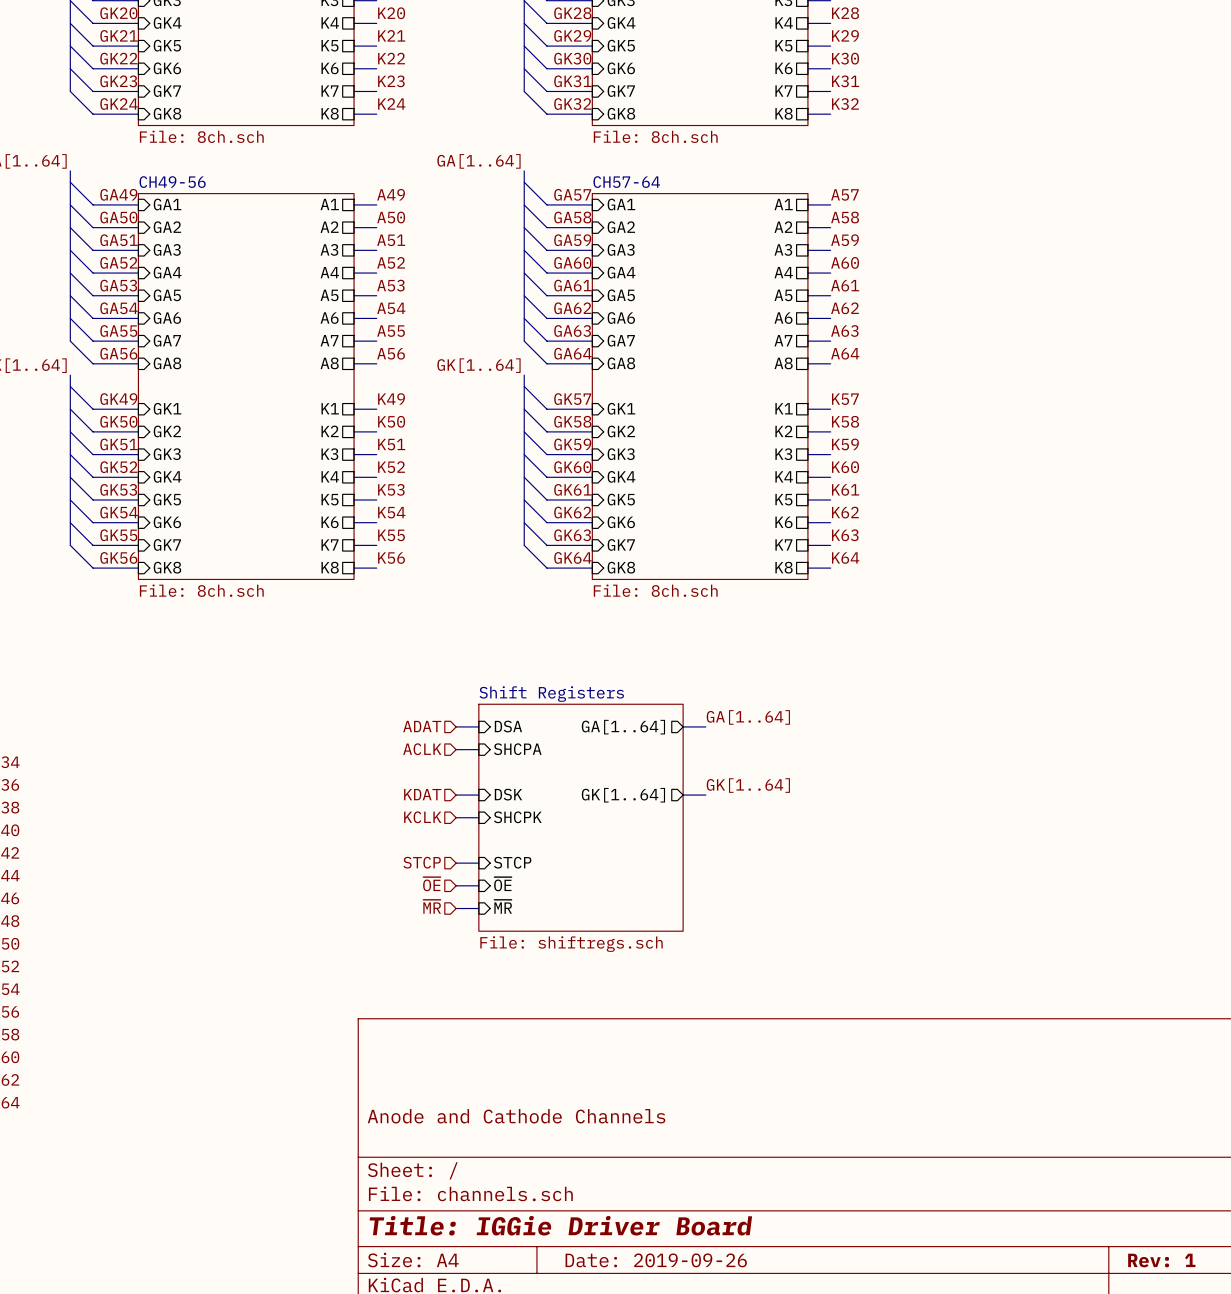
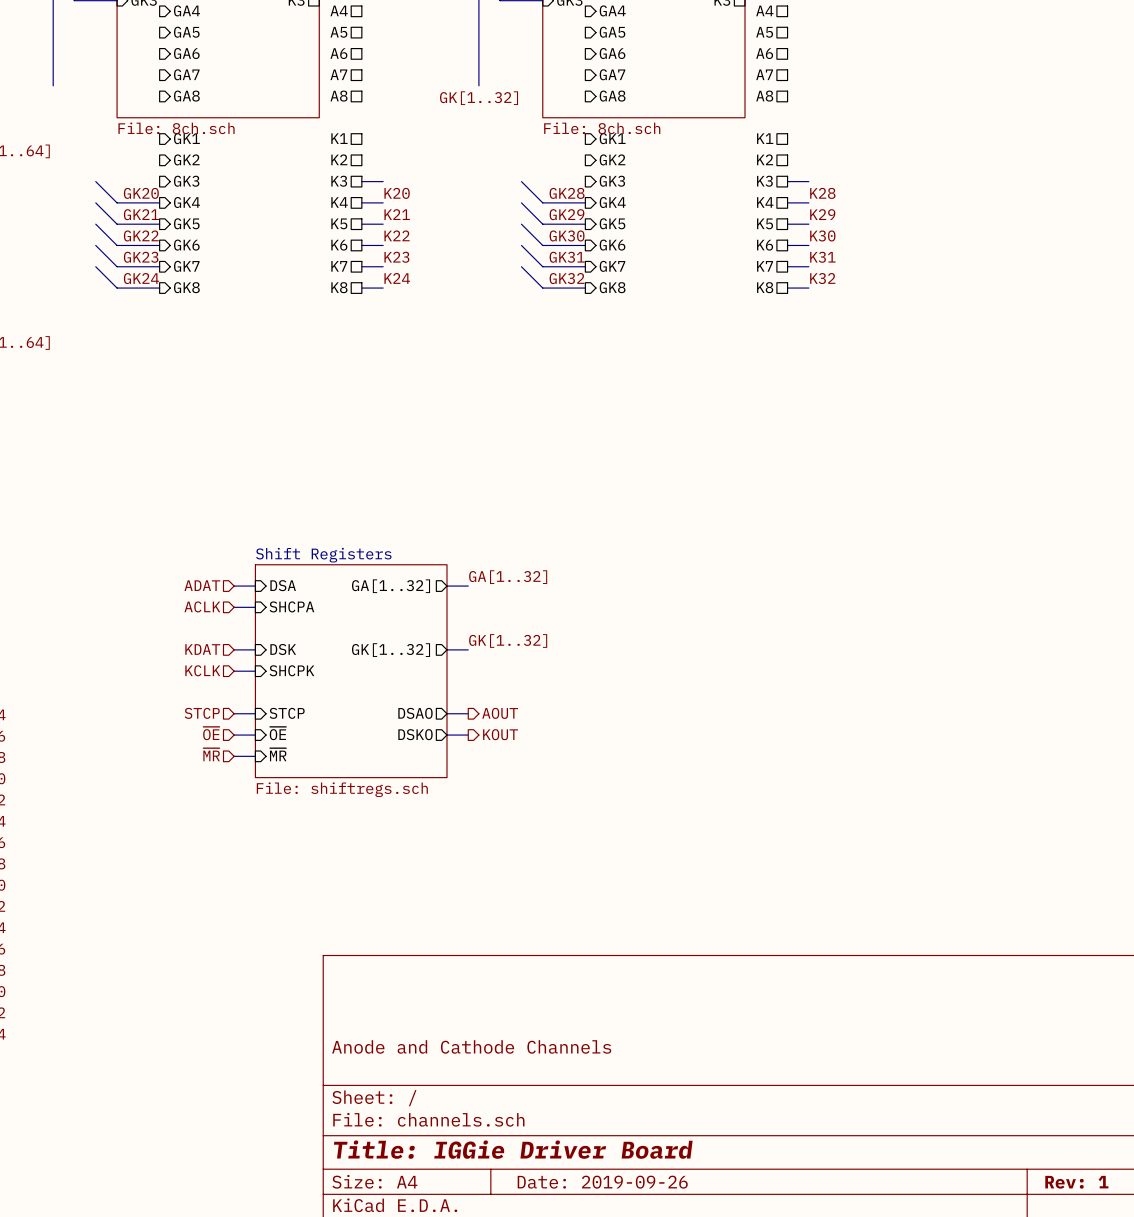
wire: (70, 0) (93, 23) (138, 23) -> (95, 181) (117, 202) (159, 202)
wire: (354, 0) (376, 0) -> (361, 181) (383, 181)
wire: (524, 0) (546, 23) (592, 23) -> (521, 181) (542, 202) (585, 202)
wire: (807, 0) (830, 0) -> (787, 181) (808, 181)
sheet pin: none -> GA4 (187, 10)
sheet pin: none -> A4 (339, 10)
sheet pin: none -> GA4 (612, 10)
sheet pin: none -> A4 (764, 10)
label position: GK20 (118, 13) -> GK20 (141, 193)
label position: K20 (391, 13) -> K20 (397, 193)
label position: GK28 (572, 13) -> GK28 (567, 193)
label position: K28 (845, 13) -> K28 (822, 193)
sheet pin: GK4 (167, 22) -> none
sheet pin: K4 (330, 22) -> none
sheet pin: GK4 (621, 22) -> none
sheet pin: K4 (784, 22) -> none
wire: (70, 23) (93, 46) (138, 46) -> (95, 202) (117, 224) (159, 224)
wire: (354, 23) (376, 23) -> (361, 202) (383, 202)
wire: (524, 23) (546, 46) (592, 46) -> (521, 202) (542, 224) (585, 224)
wire: (807, 23) (830, 23) -> (787, 202) (808, 202)
sheet pin: none -> GA5 (186, 32)
sheet pin: none -> A5 (338, 32)
sheet pin: none -> GA5 (612, 32)
sheet pin: none -> A5 (764, 32)
label position: GK21 (118, 35) -> GK21 (141, 214)
label position: K21 (391, 35) -> K21 (397, 214)
label position: GK29 (572, 35) -> GK29 (566, 214)
label position: K29 (845, 35) -> K29 (822, 214)
sheet pin: GK5 (167, 45) -> none
sheet pin: K5 (330, 45) -> none
sheet pin: GK5 (621, 45) -> none
sheet pin: K5 (783, 45) -> none
wire: (70, 46) (93, 68) (138, 68) -> (95, 224) (117, 245) (159, 245)
wire: (354, 46) (376, 46) -> (361, 224) (383, 224)
wire: (524, 46) (546, 68) (592, 68) -> (521, 224) (542, 245) (585, 245)
wire: (807, 46) (830, 46) -> (787, 224) (808, 224)
sheet pin: none -> GA6 (186, 53)
sheet pin: none -> A6 (338, 53)
sheet pin: none -> GA6 (612, 53)
sheet pin: none -> A6 (764, 53)
label position: GK22 (118, 58) -> GK22 (141, 235)
label position: K22 (391, 58) -> K22 (397, 235)
label position: GK30 (572, 58) -> GK30 (567, 235)
label position: K30 (845, 58) -> K30 (822, 235)
wire: (70, 68) (93, 91) (138, 91) -> (95, 245) (117, 266) (159, 266)
sheet pin: GK6 (167, 68) -> none
sheet pin: K6 (330, 68) -> none
wire: (354, 68) (376, 68) -> (361, 245) (383, 245)
wire: (524, 68) (546, 91) (592, 91) -> (521, 245) (542, 266) (585, 266)
sheet pin: GK6 (621, 68) -> none
sheet pin: K6 (783, 68) -> none
wire: (807, 68) (830, 68) -> (787, 245) (808, 245)
sheet pin: none -> GA7 (186, 74)
sheet pin: none -> A7 (338, 74)
sheet pin: none -> GA7 (612, 74)
sheet pin: none -> A7 (764, 74)
label position: GK23 (118, 81) -> GK23 (141, 257)
label position: K23 (391, 81) -> K23 (396, 257)
label position: GK31 (572, 81) -> GK31 (567, 257)
label position: K31 (845, 81) -> K31 (822, 257)
wire: (70, 91) (93, 114) (138, 114) -> (95, 266) (117, 288) (159, 288)
sheet pin: GK7 (167, 91) -> none
sheet pin: K7 (329, 91) -> none
wire: (354, 91) (376, 91) -> (361, 266) (383, 266)
wire: (524, 91) (546, 114) (592, 114) -> (521, 266) (542, 288) (585, 288)
sheet pin: GK7 (621, 91) -> none
sheet pin: K7 (783, 91) -> none
wire: (807, 91) (830, 91) -> (787, 266) (808, 266)
sheet pin: none -> GA8 (186, 96)
sheet pin: none -> A8 (339, 96)
sheet pin: none -> GA8 (612, 96)
sheet pin: none -> A8 (764, 96)
label position: K24 (391, 103) -> K24 (397, 278)
label position: GK24 (119, 104) -> GK24 (141, 278)
label: none -> GK[1..32] (479, 98)
label position: GK32 (572, 104) -> GK32 (567, 278)
label position: K32 (845, 104) -> K32 (822, 278)
sheet pin: GK8 (167, 113) -> none
sheet pin: K8 (330, 113) -> none
sheet pin: GK8 (621, 113) -> none
sheet pin: K8 (784, 113) -> none
wire: (354, 114) (376, 114) -> (361, 288) (383, 288)
wire: (807, 114) (830, 114) -> (787, 288) (808, 288)
sheet pin: none -> GK1 (186, 138)
sheet pin: none -> K1 (339, 138)
sheet pin: none -> GK1 (612, 138)
sheet pin: none -> K1 (765, 138)
label: GA[1..64] (478, 161) -> none
bus: (70, 170) (70, 341) -> none
sheet pin: none -> GK2 (186, 159)
sheet pin: none -> K2 (339, 159)
bus: (524, 170) (524, 341) -> none
sheet pin: none -> GK2 (612, 159)
sheet pin: none -> K2 (765, 159)
wire: (70, 182) (93, 204) (138, 204) -> none
wire: (524, 182) (546, 204) (592, 204) -> none
sheet pin: none -> GK3 (186, 181)
sheet pin: none -> K3 (339, 181)
sheet pin: none -> GK3 (612, 181)
sheet pin: none -> K3 (764, 181)
label: GA49 (118, 194) -> none
label: A49 (391, 194) -> none
label: GA57 (572, 194) -> none
label: A57 (844, 194) -> none
wire: (70, 204) (93, 227) (138, 227) -> none
sheet pin: GA1 (167, 204) -> none
sheet pin: A1 (329, 204) -> none
wire: (354, 204) (376, 204) -> none
wire: (524, 204) (546, 227) (592, 227) -> none
sheet pin: GA1 (621, 204) -> none
sheet pin: A1 (783, 204) -> none
wire: (807, 204) (830, 204) -> none
sheet pin: none -> GK4 (187, 202)
sheet pin: none -> K4 (339, 202)
sheet pin: none -> GK4 (612, 202)
sheet pin: none -> K4 (765, 202)
label: GA50 (118, 217) -> none
label: A50 (391, 217) -> none
label: GA58 (572, 217) -> none
label: A58 (845, 217) -> none
wire: (70, 227) (93, 250) (138, 250) -> none
sheet pin: GA2 (167, 227) -> none
sheet pin: A2 (329, 227) -> none
wire: (354, 227) (376, 227) -> none
wire: (524, 227) (546, 250) (592, 250) -> none
sheet pin: GA2 (621, 227) -> none
sheet pin: A2 (783, 227) -> none
wire: (807, 227) (830, 227) -> none
sheet pin: none -> GK5 (186, 223)
sheet pin: none -> K5 (339, 223)
sheet pin: none -> GK5 (612, 223)
sheet pin: none -> K5 (765, 223)
label: GA51 (118, 240) -> none
label: A51 (391, 240) -> none
label: GA59 (572, 240) -> none
label: A59 (845, 240) -> none
sheet pin: GA3 (167, 249) -> none
sheet pin: A3 (329, 249) -> none
sheet pin: GA3 (621, 249) -> none
sheet pin: A3 (783, 249) -> none
wire: (70, 250) (93, 273) (138, 273) -> none
wire: (354, 250) (376, 250) -> none
wire: (524, 250) (546, 273) (592, 273) -> none
wire: (807, 250) (830, 250) -> none
sheet pin: none -> GK6 (186, 245)
sheet pin: none -> K6 (339, 245)
sheet pin: none -> GK6 (612, 245)
sheet pin: none -> K6 (765, 245)
label: GA52 (118, 262) -> none
label: A52 (391, 262) -> none
label: GA60 (572, 262) -> none
label: A60 (845, 262) -> none
sheet pin: GA4 (167, 272) -> none
sheet pin: A4 (329, 272) -> none
sheet pin: GA4 (621, 272) -> none
sheet pin: A4 (783, 272) -> none
wire: (70, 273) (93, 295) (138, 295) -> none
wire: (354, 273) (376, 273) -> none
wire: (524, 273) (546, 295) (592, 295) -> none
wire: (807, 273) (830, 273) -> none
sheet pin: none -> GK7 (186, 266)
sheet pin: none -> K7 (339, 266)
sheet pin: none -> GK7 (612, 266)
sheet pin: none -> K7 (765, 266)
label: GA53 (118, 285) -> none
label: A53 (390, 285) -> none
label: GA61 (572, 285) -> none
label: A61 (845, 285) -> none
wire: (70, 295) (93, 318) (138, 318) -> none
sheet pin: GA5 (167, 295) -> none
sheet pin: A5 (329, 295) -> none
wire: (354, 295) (376, 295) -> none
wire: (524, 295) (546, 318) (592, 318) -> none
sheet pin: GA5 (621, 295) -> none
sheet pin: A5 (783, 295) -> none
wire: (807, 295) (830, 295) -> none
sheet pin: none -> GK8 (186, 287)
sheet pin: none -> K8 (339, 287)
sheet pin: none -> GK8 (612, 287)
sheet pin: none -> K8 (765, 287)
label: GA54 (119, 308) -> none
label: A54 (391, 308) -> none
label: GA62 (572, 308) -> none
label: A62 (845, 308) -> none
wire: (70, 318) (93, 341) (138, 341) -> none
sheet pin: GA6 (167, 318) -> none
sheet pin: A6 (329, 318) -> none
wire: (354, 318) (376, 318) -> none
wire: (524, 318) (546, 341) (592, 341) -> none
sheet pin: GA6 (621, 318) -> none
sheet pin: A6 (783, 318) -> none
wire: (807, 318) (830, 318) -> none
label: GA55 (118, 331) -> none
label: A55 (391, 331) -> none
label: GA63 (572, 331) -> none
label: A63 (844, 331) -> none
sheet pin: GA7 (167, 340) -> none
sheet pin: A7 (329, 340) -> none
sheet pin: GA7 (621, 340) -> none
sheet pin: A7 (783, 340) -> none
wire: (70, 341) (93, 363) (138, 363) -> none
wire: (354, 341) (376, 341) -> none
wire: (524, 341) (546, 363) (592, 363) -> none
wire: (807, 341) (830, 341) -> none
label: GA56 (118, 353) -> none
label: A56 (391, 353) -> none
label: GA64 (572, 353) -> none
label: A64 (845, 353) -> none
sheet pin: GA8 (167, 363) -> none
sheet pin: A8 (329, 363) -> none
wire: (354, 363) (376, 363) -> none
sheet pin: GA8 (621, 363) -> none
sheet pin: A8 (783, 363) -> none
wire: (807, 363) (830, 363) -> none
label: GK[1..64] (478, 365) -> none
bus: (70, 375) (70, 545) -> none
bus: (524, 375) (524, 545) -> none
wire: (70, 386) (93, 409) (138, 409) -> none
sheet CH49-56: File: 8ch.sch (246, 386) -> none
wire: (524, 386) (546, 409) (592, 409) -> none
sheet CH57-64: File: 8ch.sch (700, 386) -> none
label: K49 (391, 398) -> none
label: GK49 (118, 399) -> none
label: GK57 (572, 399) -> none
label: K57 (845, 399) -> none
sheet pin: GK1 (167, 408) -> none
sheet pin: K1 (330, 408) -> none
sheet pin: GK1 (621, 408) -> none
sheet pin: K1 (784, 408) -> none
wire: (70, 409) (93, 431) (138, 431) -> none
wire: (354, 409) (376, 409) -> none
wire: (524, 409) (546, 431) (592, 431) -> none
wire: (807, 409) (830, 409) -> none
label: GK50 (118, 421) -> none
label: K50 (391, 421) -> none
label: GK58 (572, 421) -> none
label: K58 (845, 421) -> none
wire: (70, 431) (93, 454) (138, 454) -> none
sheet pin: GK2 (167, 431) -> none
sheet pin: K2 (330, 431) -> none
wire: (354, 431) (376, 431) -> none
wire: (524, 431) (546, 454) (592, 454) -> none
sheet pin: GK2 (621, 431) -> none
sheet pin: K2 (783, 431) -> none
wire: (807, 431) (830, 431) -> none
label: GK51 (118, 444) -> none
label: K51 (391, 444) -> none
label: GK59 (572, 444) -> none
label: K59 (845, 444) -> none
wire: (70, 454) (93, 477) (138, 477) -> none
sheet pin: GK3 (167, 454) -> none
sheet pin: K3 (329, 454) -> none
wire: (354, 454) (376, 454) -> none
wire: (524, 454) (546, 477) (592, 477) -> none
sheet pin: GK3 (621, 454) -> none
sheet pin: K3 (783, 454) -> none
wire: (807, 454) (830, 454) -> none
label: GK52 (118, 467) -> none
label: K52 (391, 467) -> none
label: GK60 (572, 467) -> none
label: K60 (845, 467) -> none
sheet pin: GK4 (167, 476) -> none
sheet pin: K4 (330, 476) -> none
sheet pin: GK4 (621, 476) -> none
sheet pin: K4 (784, 476) -> none
wire: (70, 477) (93, 499) (138, 499) -> none
wire: (354, 477) (376, 477) -> none
wire: (524, 477) (546, 499) (592, 499) -> none
wire: (807, 477) (830, 477) -> none
label: GK53 (118, 489) -> none
label: K53 (391, 489) -> none
label: GK61 (572, 489) -> none
label: K61 (845, 489) -> none
wire: (70, 499) (93, 522) (138, 522) -> none
sheet pin: GK5 (167, 499) -> none
sheet pin: K5 (330, 499) -> none
wire: (354, 499) (376, 499) -> none
wire: (524, 499) (546, 522) (592, 522) -> none
sheet pin: GK5 (621, 499) -> none
sheet pin: K5 (783, 499) -> none
wire: (807, 499) (830, 499) -> none
label: GK54 (119, 512) -> none
label: K54 (391, 512) -> none
label: GK62 (572, 512) -> none
label: K62 (845, 512) -> none
wire: (70, 522) (93, 545) (138, 545) -> none
sheet pin: GK6 (167, 522) -> none
sheet pin: K6 (330, 522) -> none
wire: (354, 522) (376, 522) -> none
wire: (524, 522) (546, 545) (592, 545) -> none
sheet pin: GK6 (621, 522) -> none
sheet pin: K6 (783, 522) -> none
wire: (807, 522) (830, 522) -> none
label: GK55 (118, 535) -> none
label: K55 (391, 535) -> none
label: GK63 (572, 535) -> none
label: K63 (845, 535) -> none
sheet pin: GK7 (167, 544) -> none
sheet pin: K7 (329, 544) -> none
sheet pin: GK7 (621, 544) -> none
sheet pin: K7 (783, 544) -> none
wire: (70, 545) (93, 568) (138, 568) -> none
wire: (354, 545) (376, 545) -> none
wire: (524, 545) (546, 568) (592, 568) -> none
wire: (807, 545) (830, 545) -> none
label: GK56 (118, 557) -> none
label: GK64 (572, 557) -> none
label: K56 (391, 558) -> none
label: K64 (845, 558) -> none
sheet pin: GK8 (167, 567) -> none
sheet pin: K8 (330, 567) -> none
sheet pin: GK8 (621, 567) -> none
sheet pin: K8 (784, 567) -> none
wire: (354, 568) (376, 568) -> none
wire: (807, 568) (830, 568) -> none
label: none -> GA[1..32] (508, 577)
sheet pin: none -> GA[1..32] (391, 586)
label: none -> GK[1..32] (508, 640)
sheet pin: none -> GK[1..32] (391, 650)
label: GA[1..64] (748, 717) -> none
hierarchical label position: ADAT (422, 726) -> ADAT (202, 585)
wire: (456, 726) (478, 726) -> (234, 586) (255, 586)
sheet pin position: DSA (508, 726) -> DSA (283, 585)
bus: (683, 726) (705, 726) -> (446, 586) (468, 586)
sheet pin: GA[1..64] (623, 727) -> none
hierarchical label position: ACLK (422, 749) -> ACLK (202, 606)
wire: (456, 749) (478, 749) -> (234, 607) (255, 607)
sheet pin position: SHCPA (517, 749) -> SHCPA (291, 606)
sheet pin: none -> DSAO (415, 713)
hierarchical label: none -> AOUT (500, 713)
wire: none -> (446, 713) (468, 713)
sheet pin: none -> DSKO (415, 734)
wire: none -> (446, 735) (468, 735)
hierarchical label: none -> KOUT (500, 734)
label: GK[1..64] (748, 785) -> none
hierarchical label position: KDAT (422, 794) -> KDAT (202, 649)
sheet pin position: DSK (508, 794) -> DSK (283, 649)
wire: (456, 795) (478, 795) -> (234, 649) (255, 649)
sheet pin: GK[1..64] (623, 795) -> none
bus: (683, 795) (705, 795) -> (446, 649) (468, 649)
hierarchical label position: KCLK (422, 817) -> KCLK (202, 670)
wire: (456, 817) (478, 817) -> (234, 671) (255, 671)
sheet pin position: SHCPK (517, 817) -> SHCPK (291, 670)
sheet Shift Registers position: (580, 817) -> (351, 671)
hierarchical label position: STCP (422, 862) -> STCP (202, 713)
sheet pin position: STCP (512, 862) -> STCP (287, 713)
wire: (456, 863) (478, 863) -> (234, 713) (255, 713)
hierarchical label position: ~{OE} (431, 884) -> ~{OE} (211, 733)
sheet pin position: ~{OE} (502, 884) -> ~{OE} (277, 733)
wire: (456, 885) (478, 885) -> (234, 735) (255, 735)
hierarchical label position: ~{MR} (432, 906) -> ~{MR} (211, 754)
sheet pin position: ~{MR} (503, 906) -> ~{MR} (278, 754)
wire: (456, 908) (478, 908) -> (234, 756) (255, 756)

